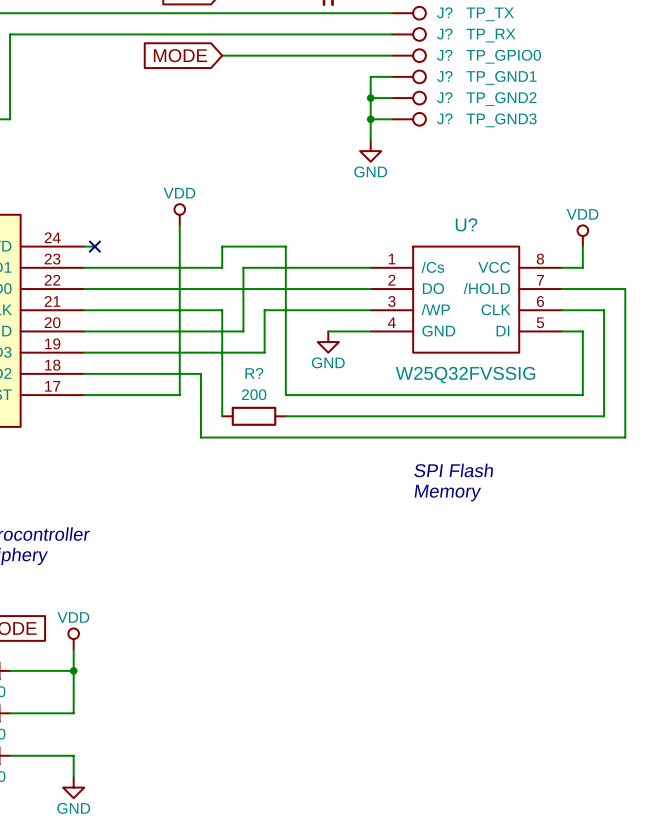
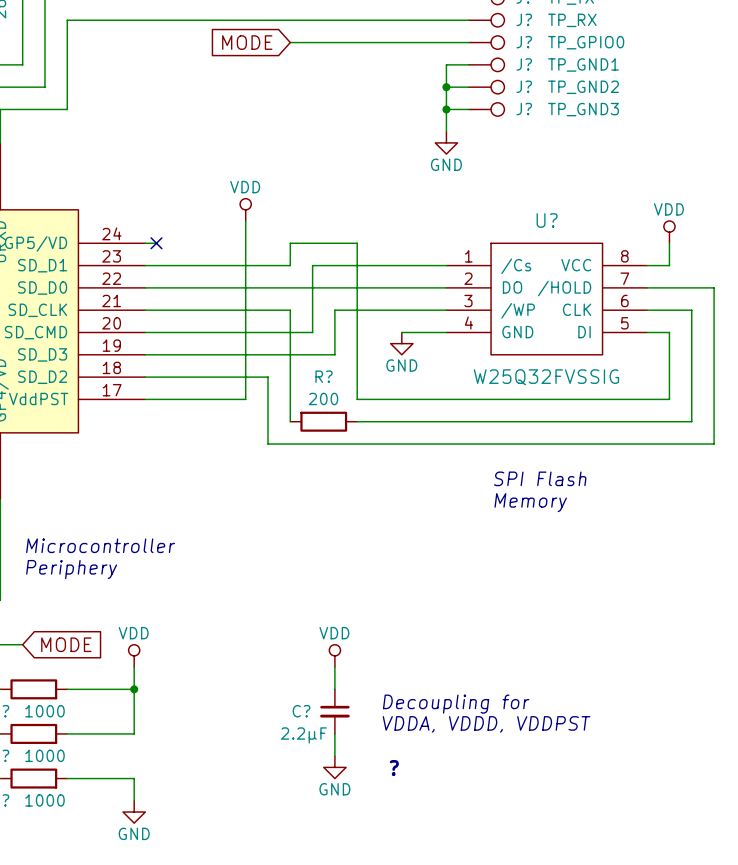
power symbol: none -> VDD (334, 655)
wire: none -> (334, 667) (334, 689)
text: none -> Decoupling for (456, 704)
C?: none -> 2.2μF (334, 711)
text: none -> VDDA, VDDD, VDDPST (486, 724)
wire: none -> (334, 733) (334, 756)
power symbol: none -> GND (334, 767)
text: none -> ? (394, 768)

